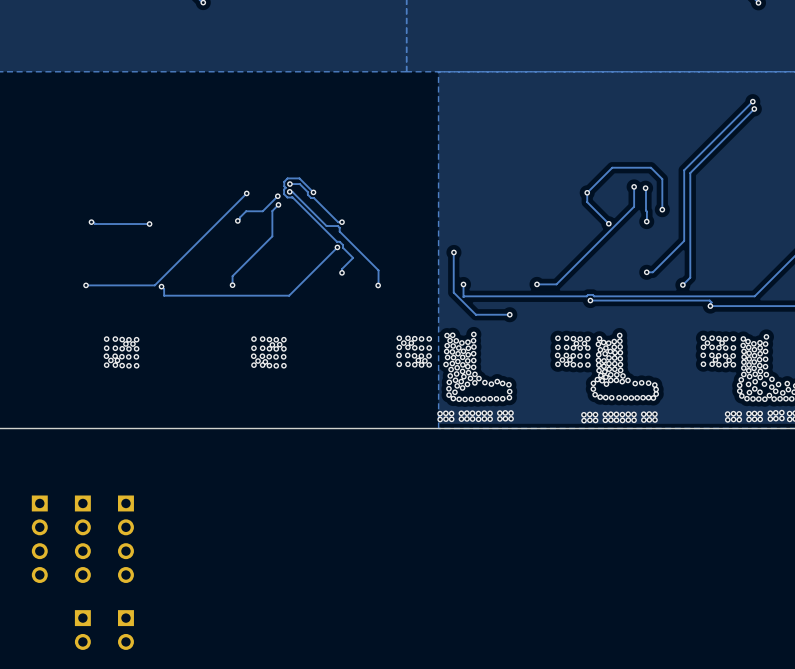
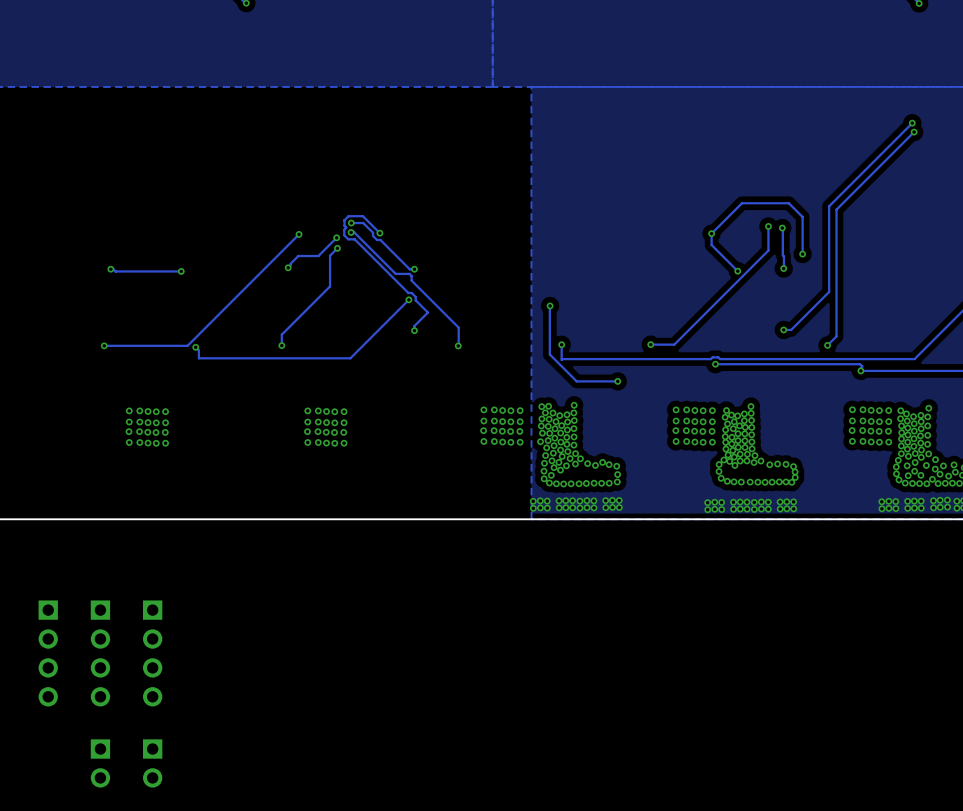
via: (403, 343) -> none
via: (411, 343) -> none
via: (576, 343) -> none
via: (584, 343) -> none
via: (707, 343) -> none
via: (722, 343) -> none
via: (125, 344) -> none
via: (132, 344) -> none
via: (272, 344) -> none
via: (279, 344) -> none
via: (562, 359) -> none
via: (569, 359) -> none
via: (715, 359) -> none
via: (110, 360) -> none
via: (117, 360) -> none
via: (418, 360) -> none
via: (424, 360) -> none
via: (729, 360) -> none
via: (258, 361) -> none
via: (265, 361) -> none

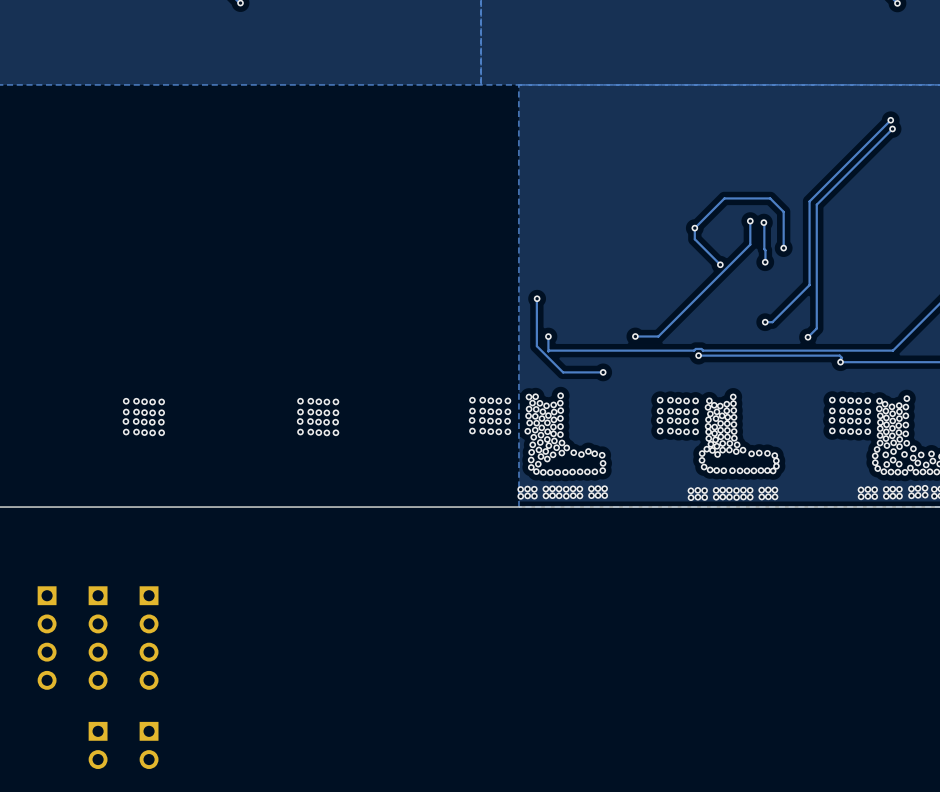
track: (344, 220) (346, 227) (344, 235) (348, 239) (354, 238) (408, 293) (411, 293) (415, 297) (415, 300) (427, 312) (414, 326) (414, 330) -> none
track: (344, 220) (348, 216) (362, 216) (379, 233) -> none
track: (351, 223) (363, 223) (377, 240) (380, 240) (409, 269) (414, 269) -> none
via: (351, 223) -> none
track: (351, 232) (354, 232) (395, 273) (409, 273) (411, 276) (411, 280) (458, 327) (458, 345) -> none
via: (351, 232) -> none
via: (379, 233) -> none
track: (299, 234) (187, 345) (104, 345) -> none
via: (299, 234) -> none
track: (336, 237) (318, 256) (298, 256) (288, 267) -> none
via: (336, 237) -> none
track: (337, 248) (330, 255) (330, 286) (281, 334) (281, 345) -> none
via: (337, 248) -> none
via: (288, 267) -> none
track: (110, 269) (115, 271) (181, 271) -> none
via: (110, 269) -> none
via: (414, 269) -> none
via: (181, 271) -> none
track: (408, 299) (350, 358) (198, 358) (198, 350) (195, 347) -> none
via: (408, 299) -> none
via: (414, 330) -> none
via: (104, 345) -> none
via: (281, 345) -> none
via: (458, 345) -> none
via: (195, 347) -> none

